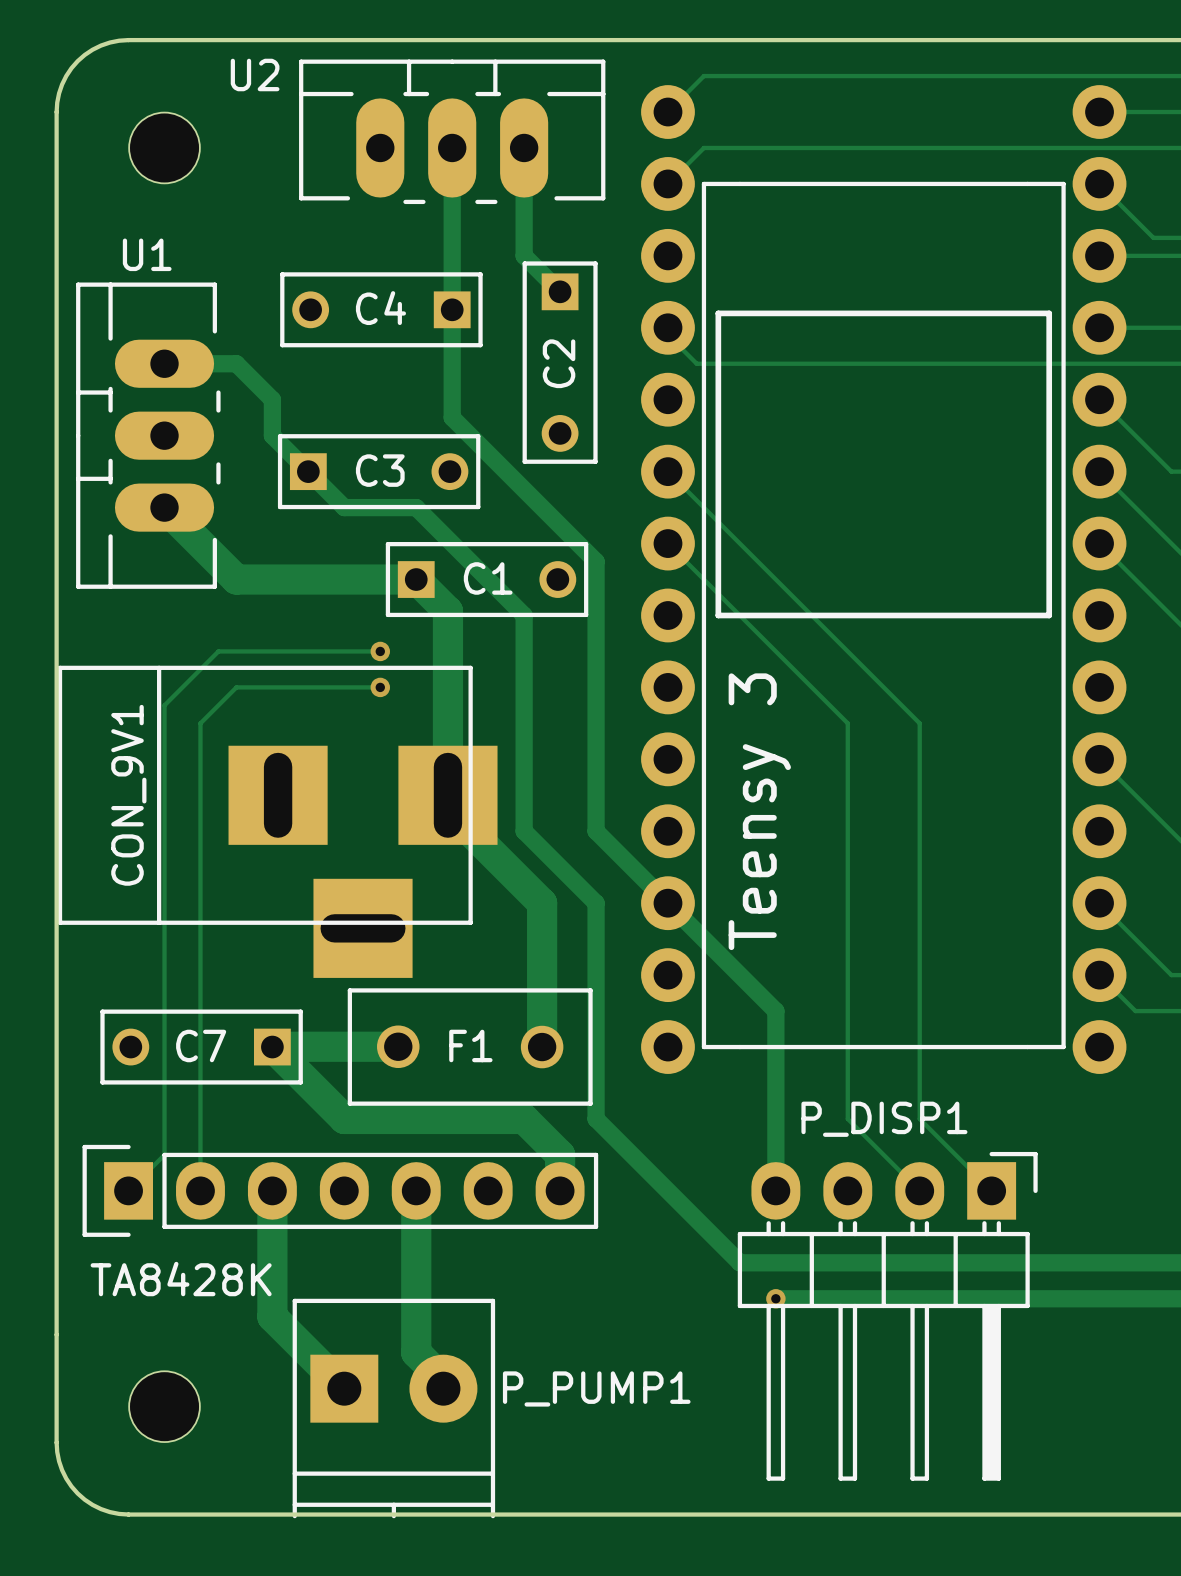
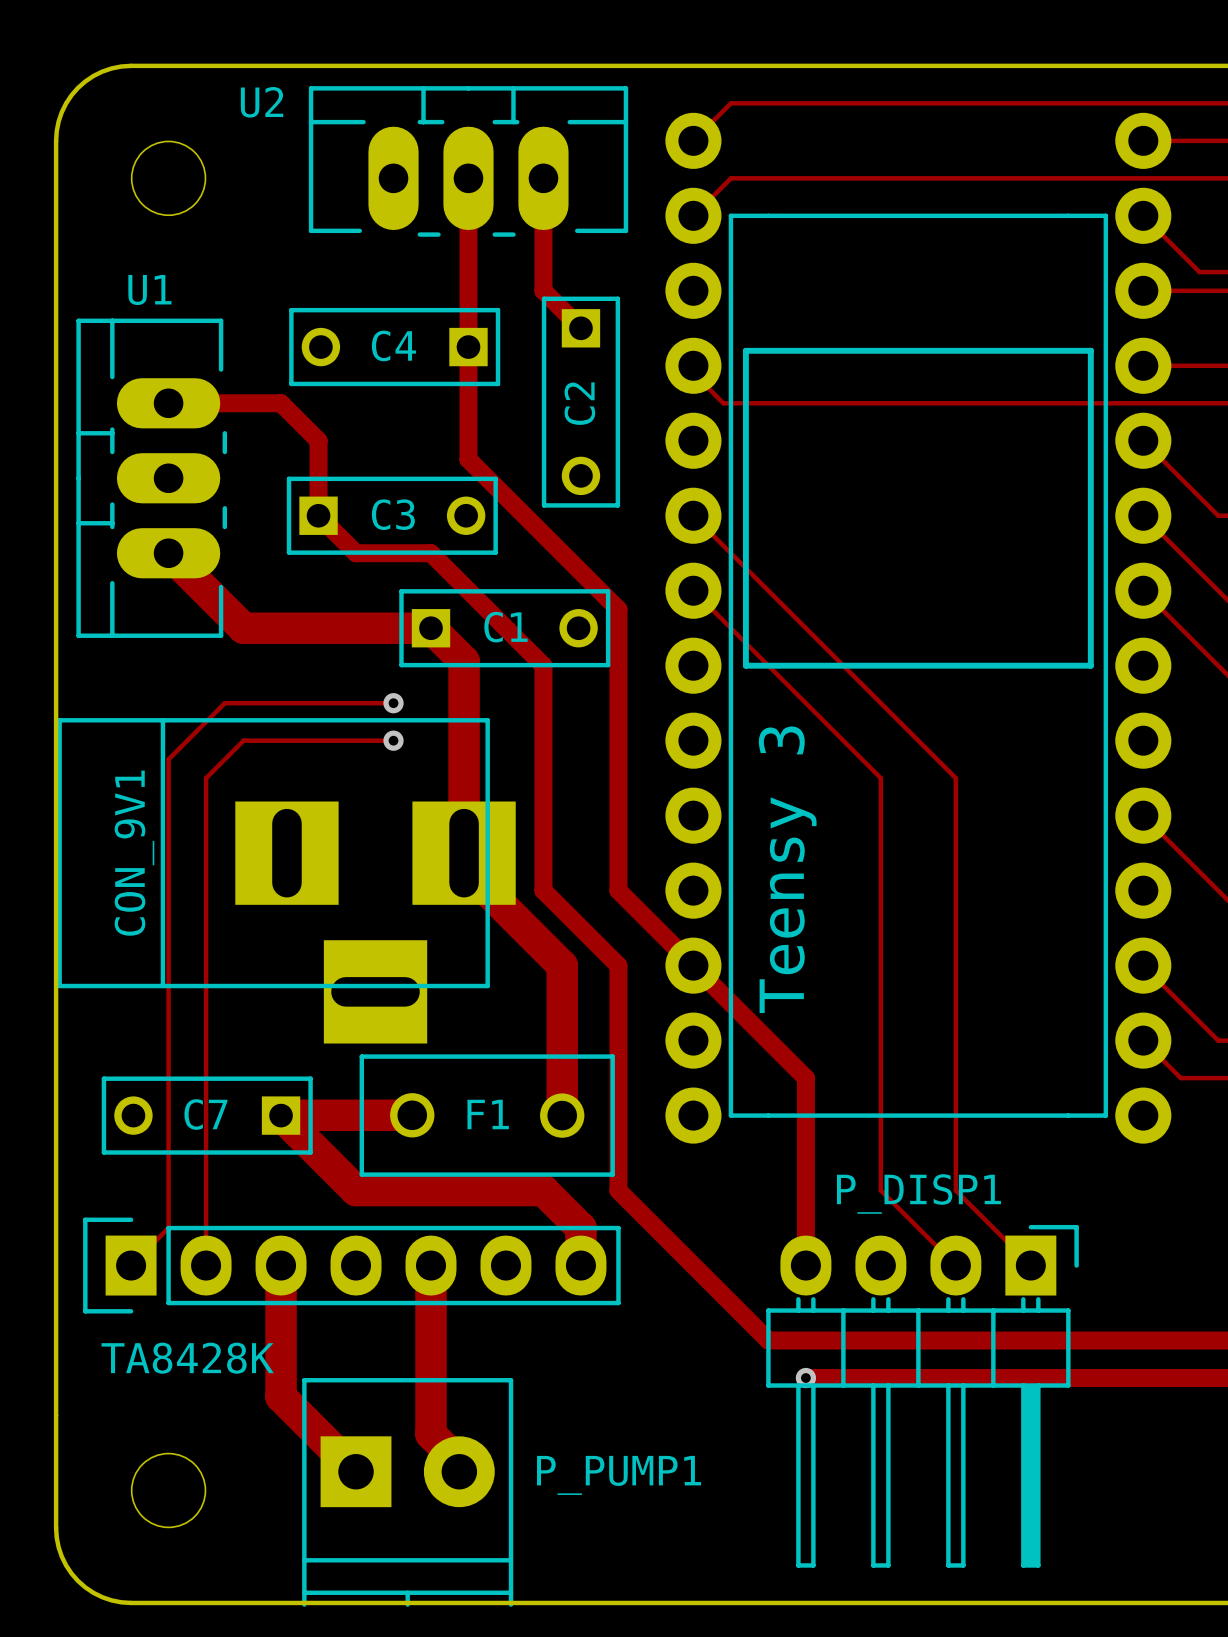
track: (236, 363) (272, 399) (272, 435) (308, 471) -> (243, 403) (281, 403) (318, 440) (318, 515)

